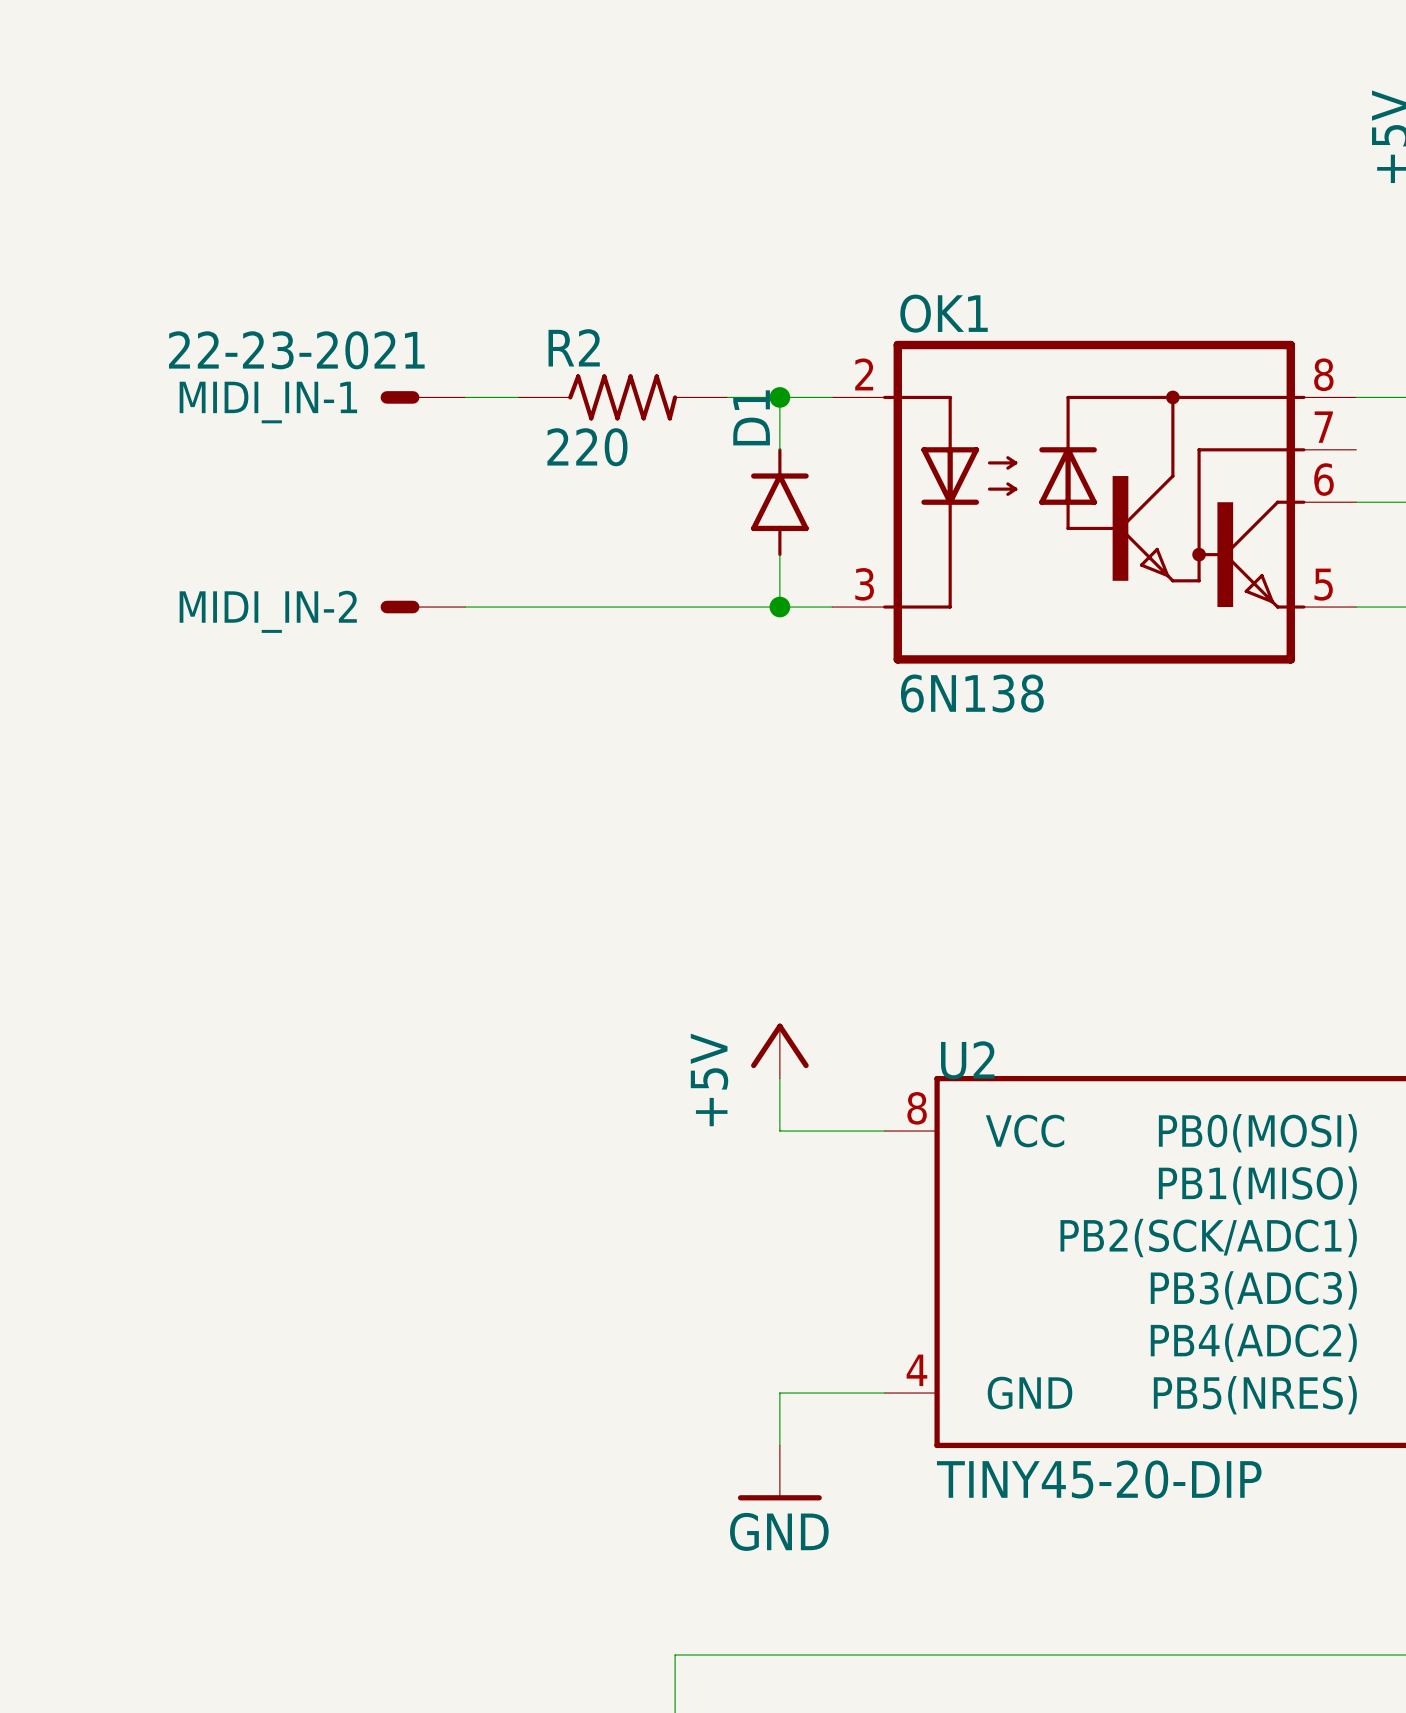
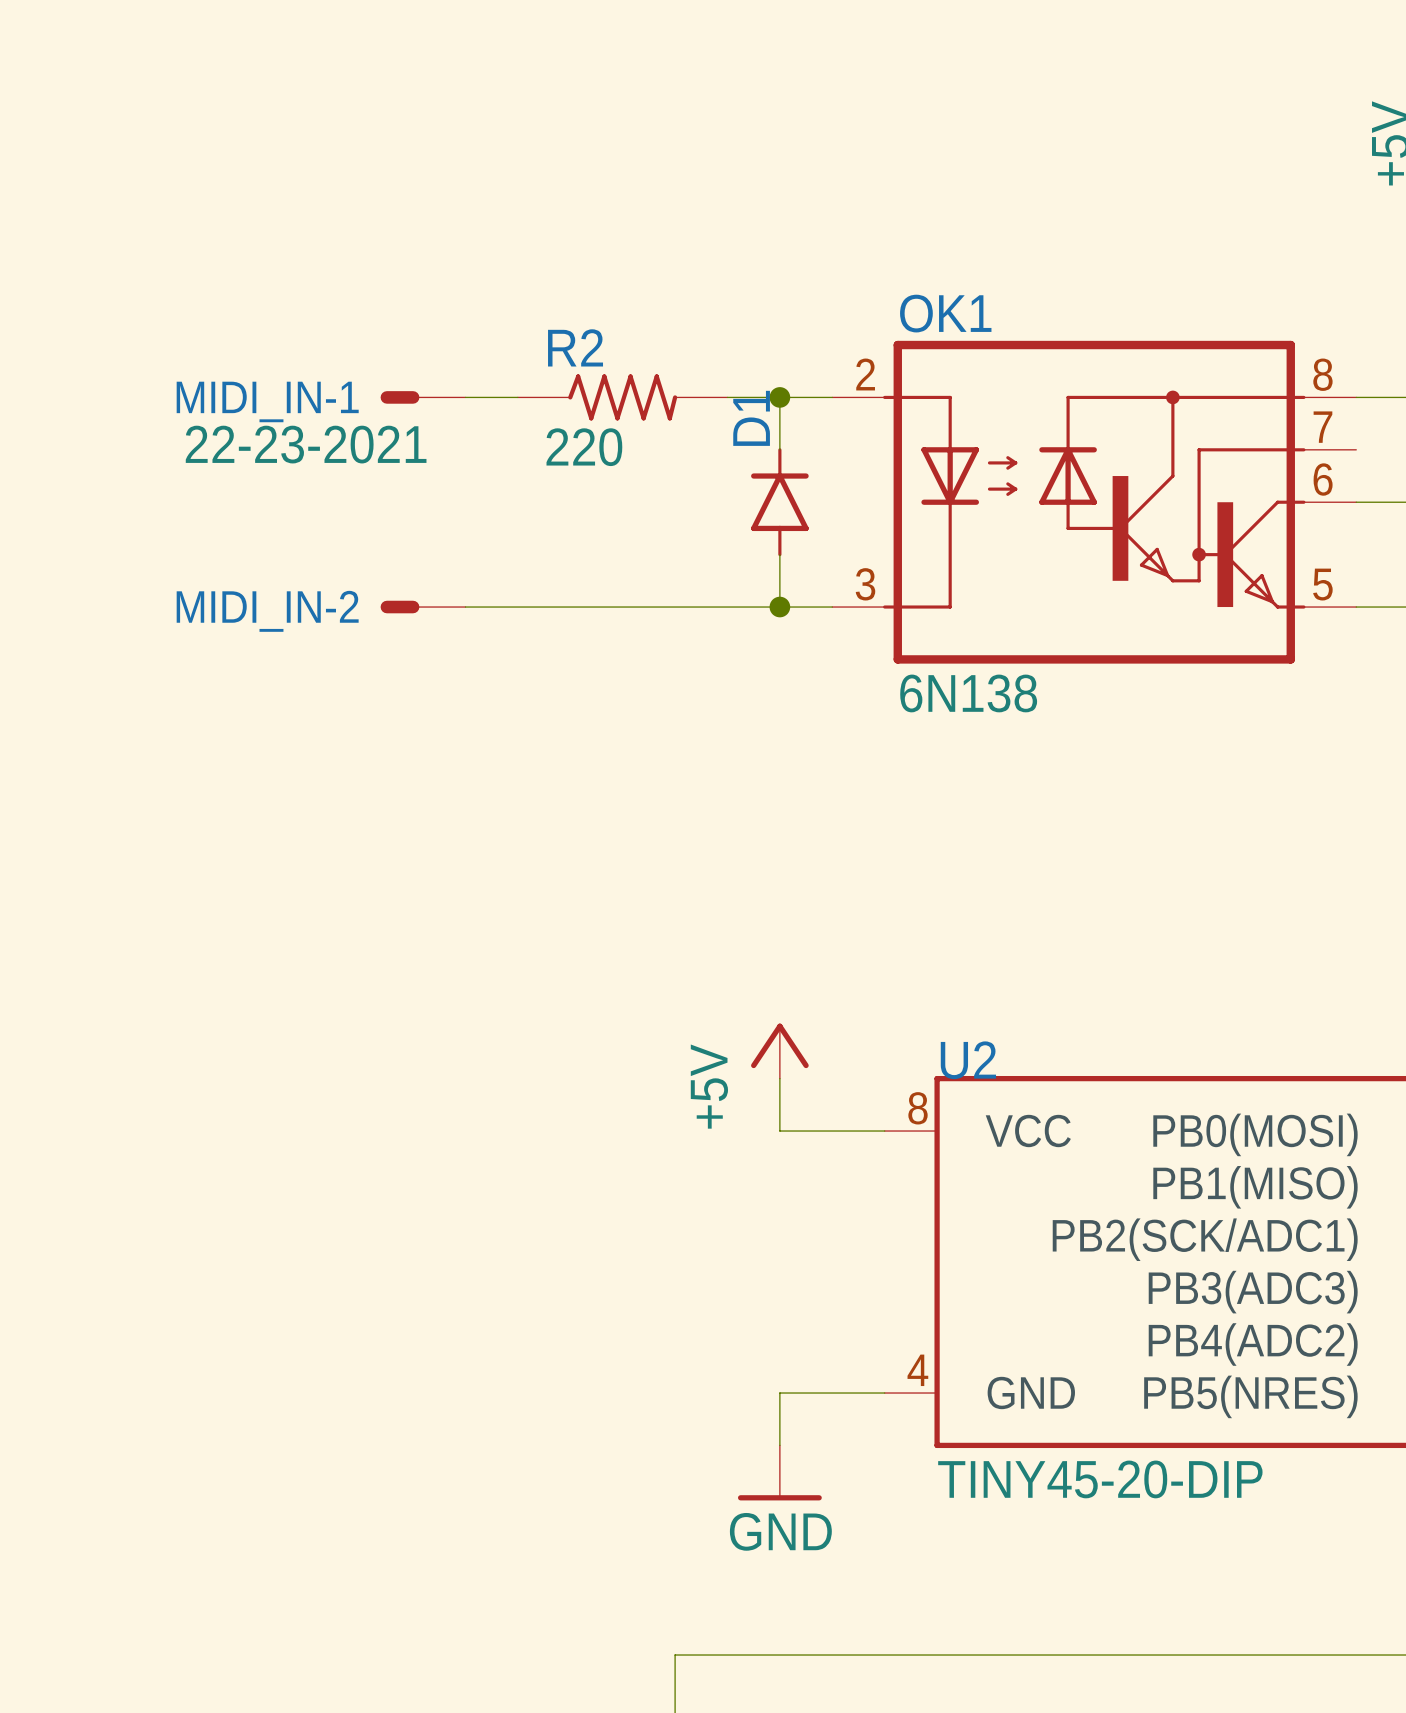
MIDI_IN-1 value position: 22-23-2021 (296, 350) -> 22-23-2021 (306, 444)

